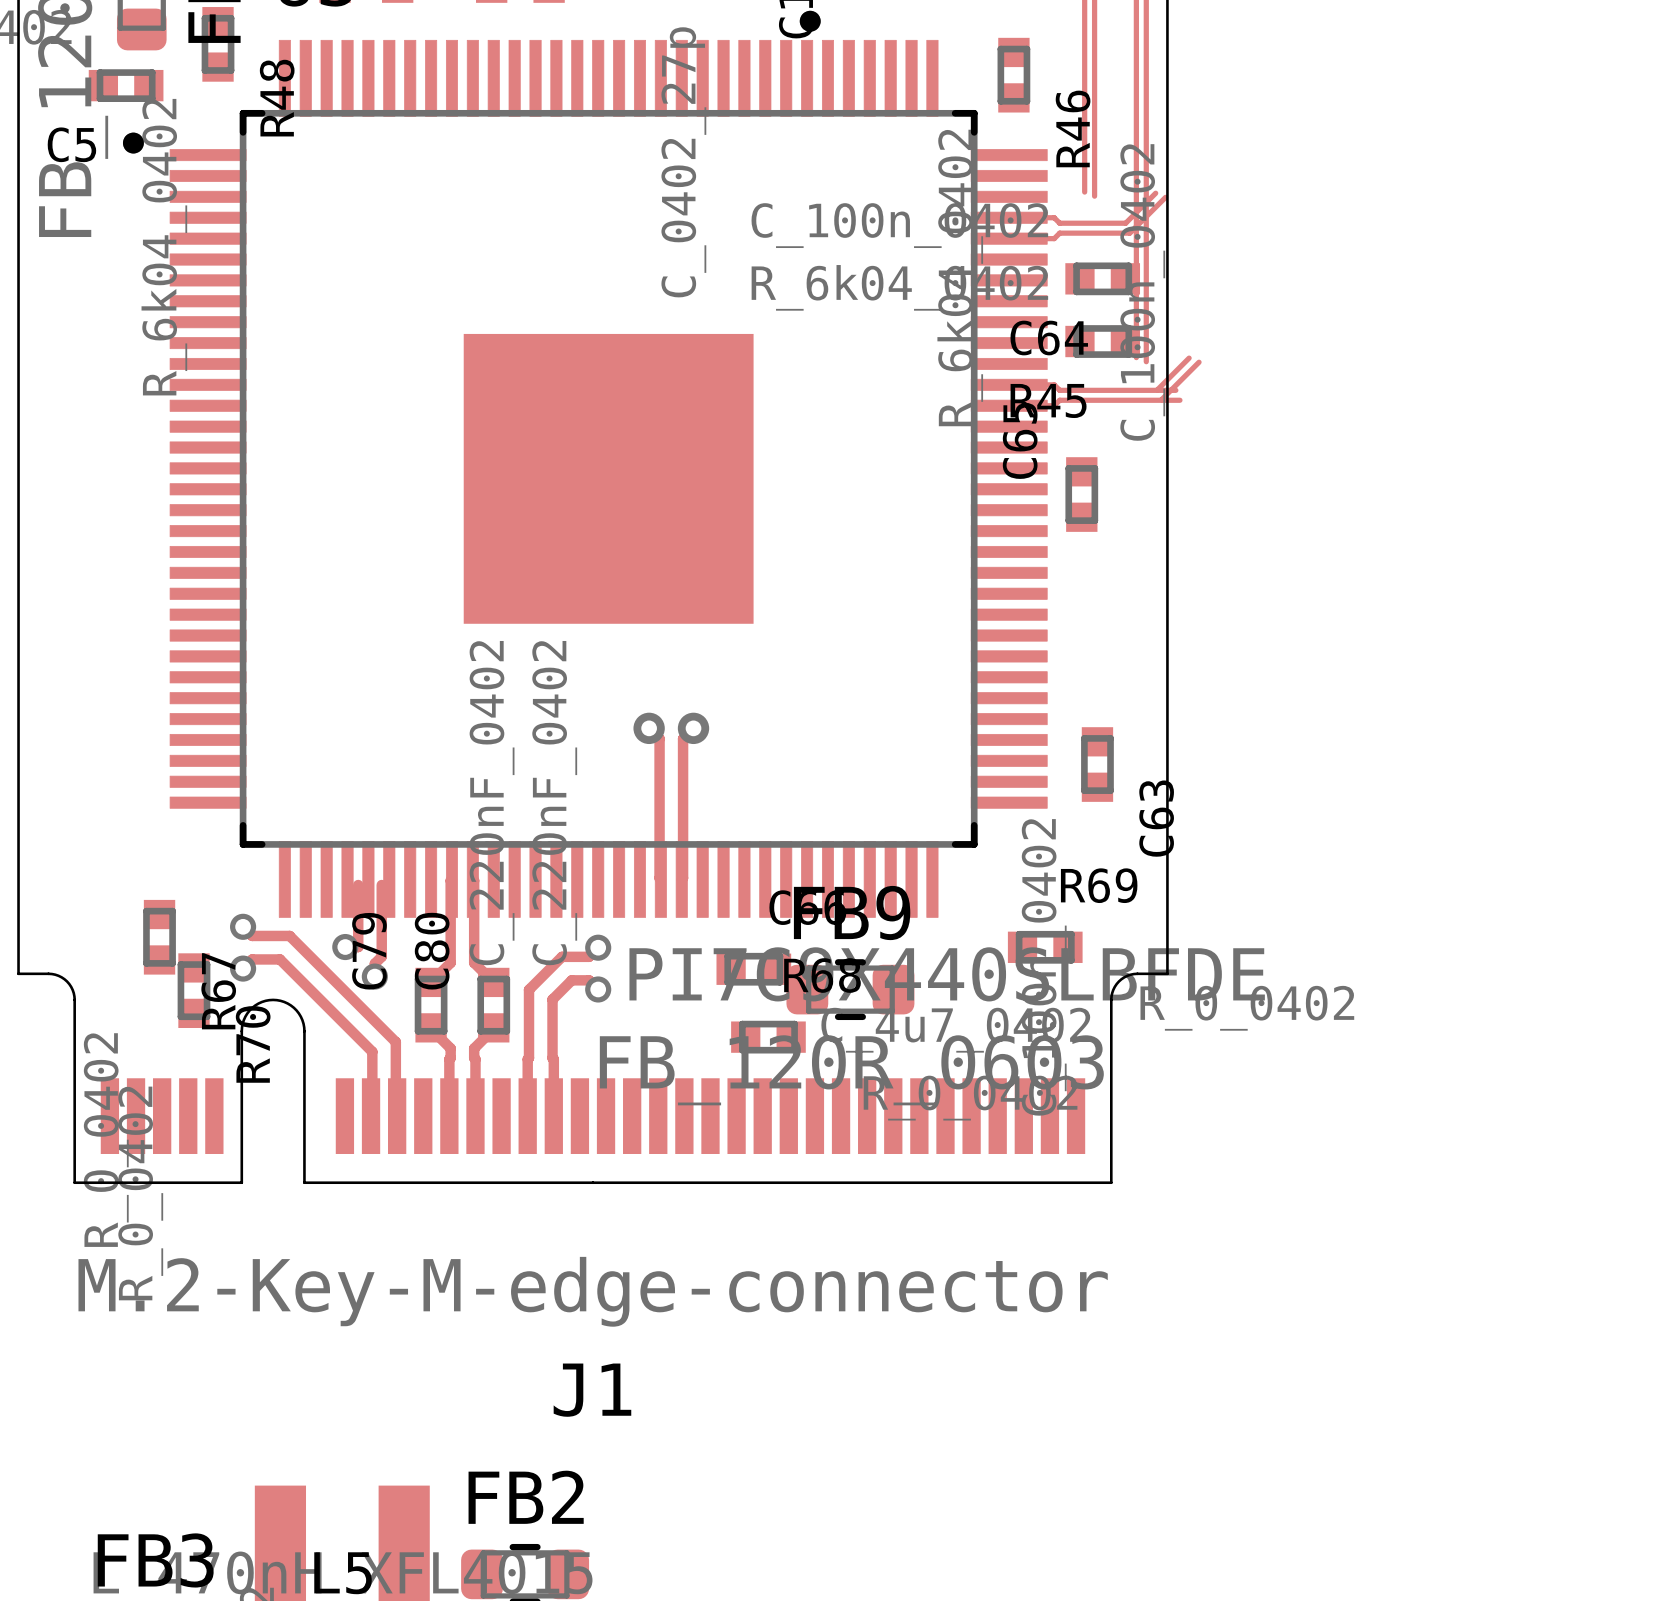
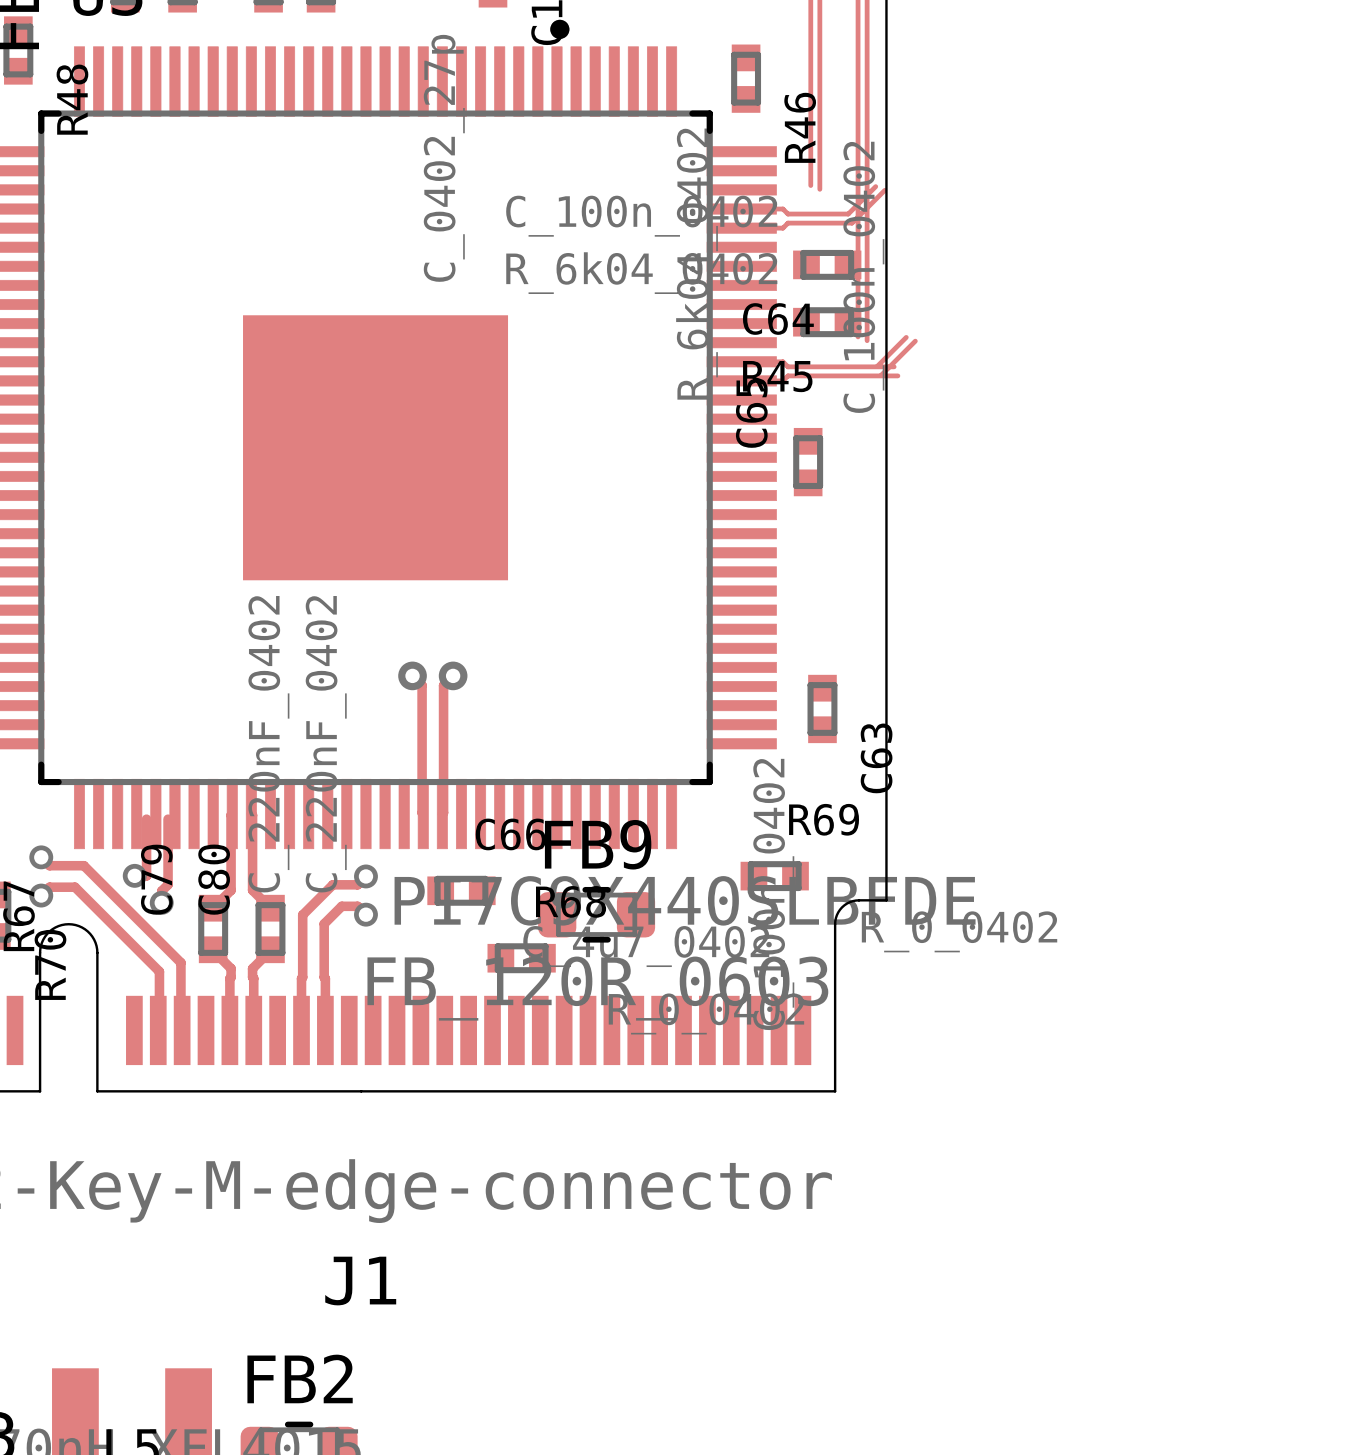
C66 position: (753, 969) -> (461, 890)

